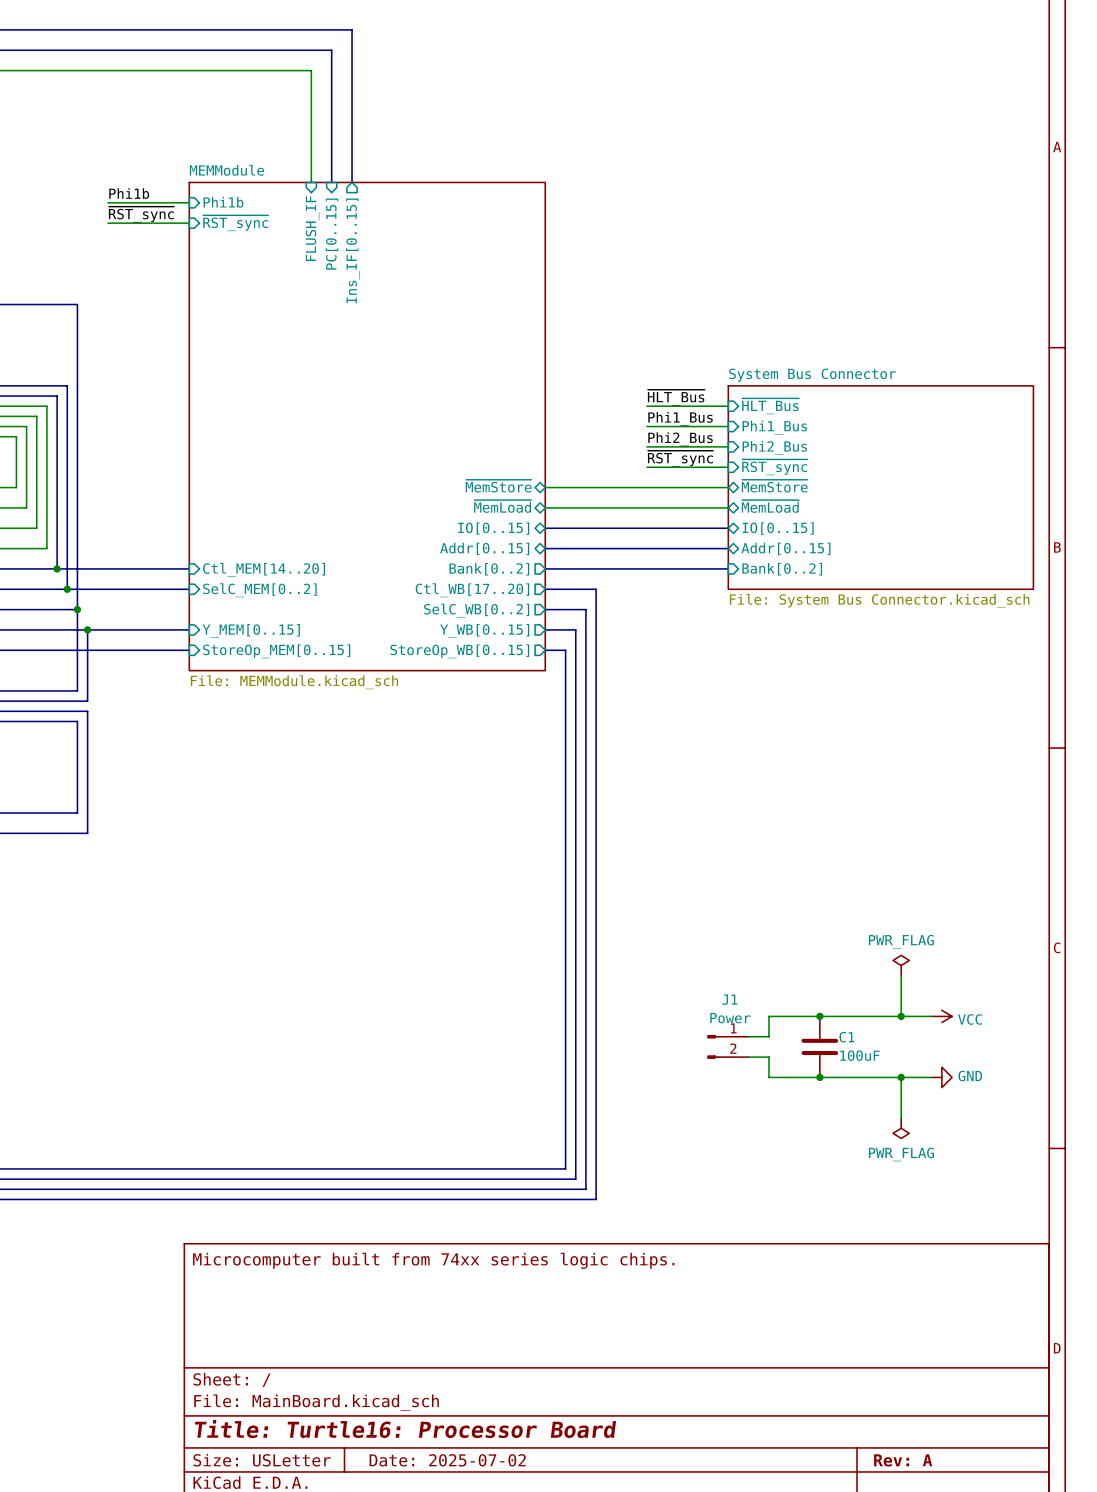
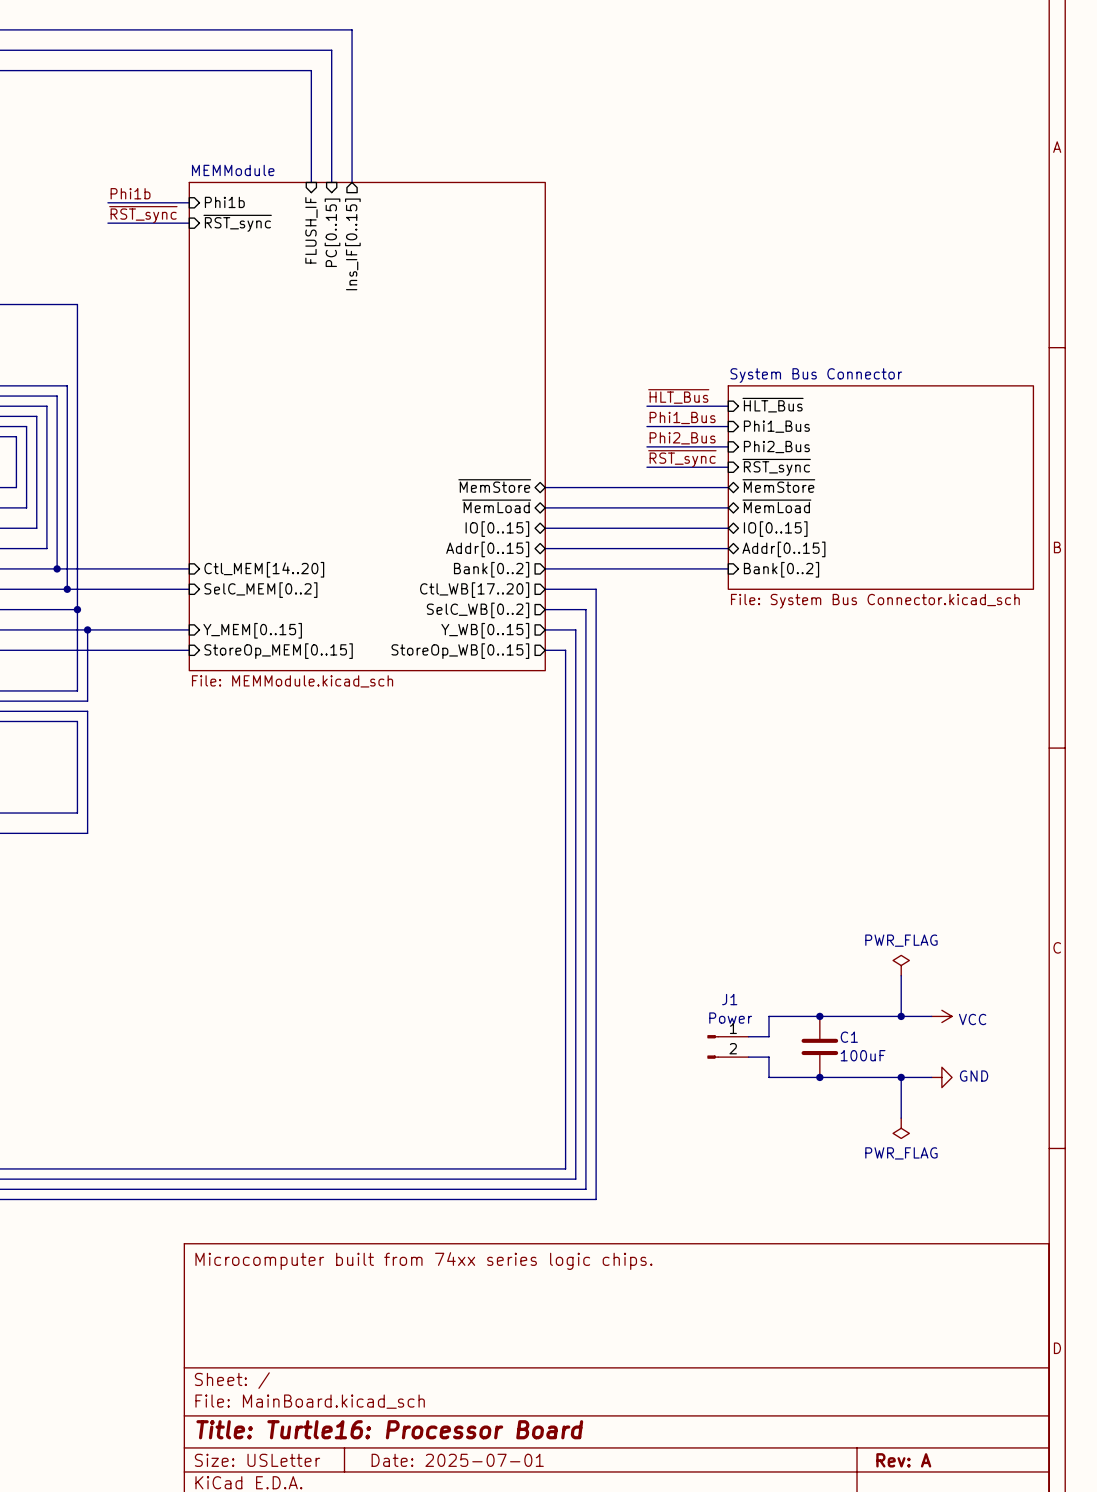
title block: Date: 2025-07-02 (447, 1460) -> Date: 2025-07-01 (457, 1460)

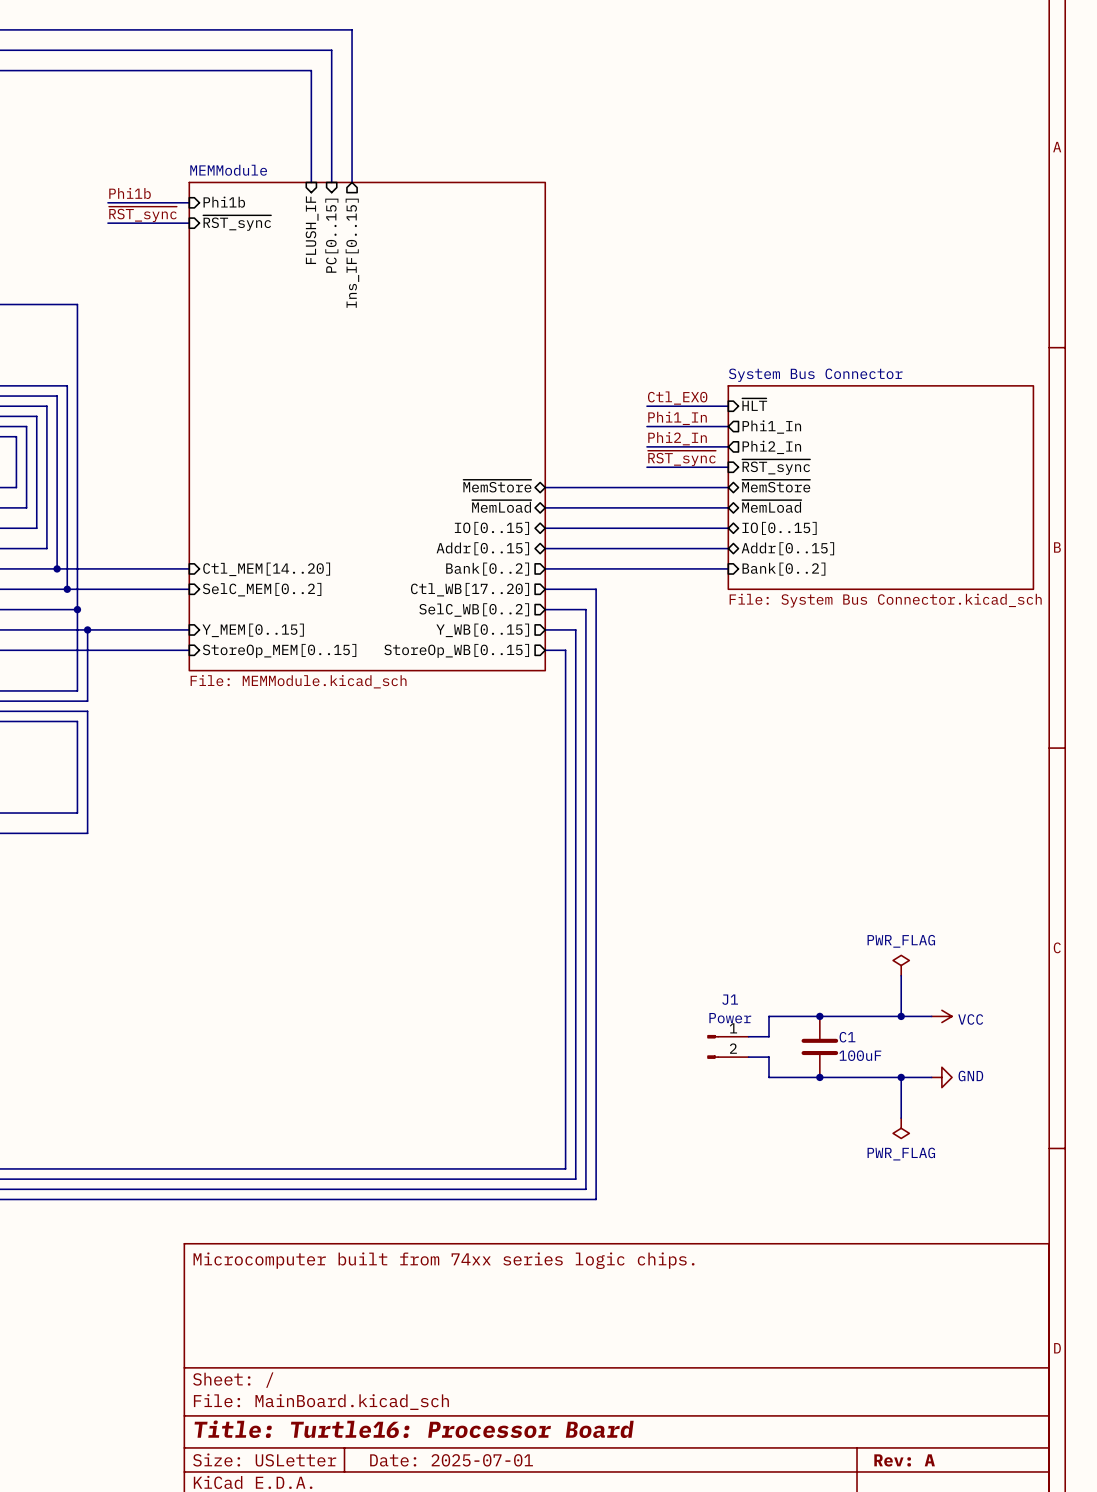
label: ~{HLT_Bus} (678, 396) -> Ctl_EX0 (677, 398)
sheet pin: ~{HLT_Bus} (773, 405) -> ~{HLT} (754, 404)
label: Phi1_Bus (682, 417) -> Phi1_In (677, 418)
sheet pin shape: input (776, 426) -> output (771, 427)
sheet pin: Phi1_Bus (776, 426) -> Phi1_In (771, 427)
label: Phi2_Bus (682, 438) -> Phi2_In (677, 438)
sheet pin shape: input (776, 446) -> output (771, 447)
sheet pin: Phi2_Bus (776, 446) -> Phi2_In (771, 447)

